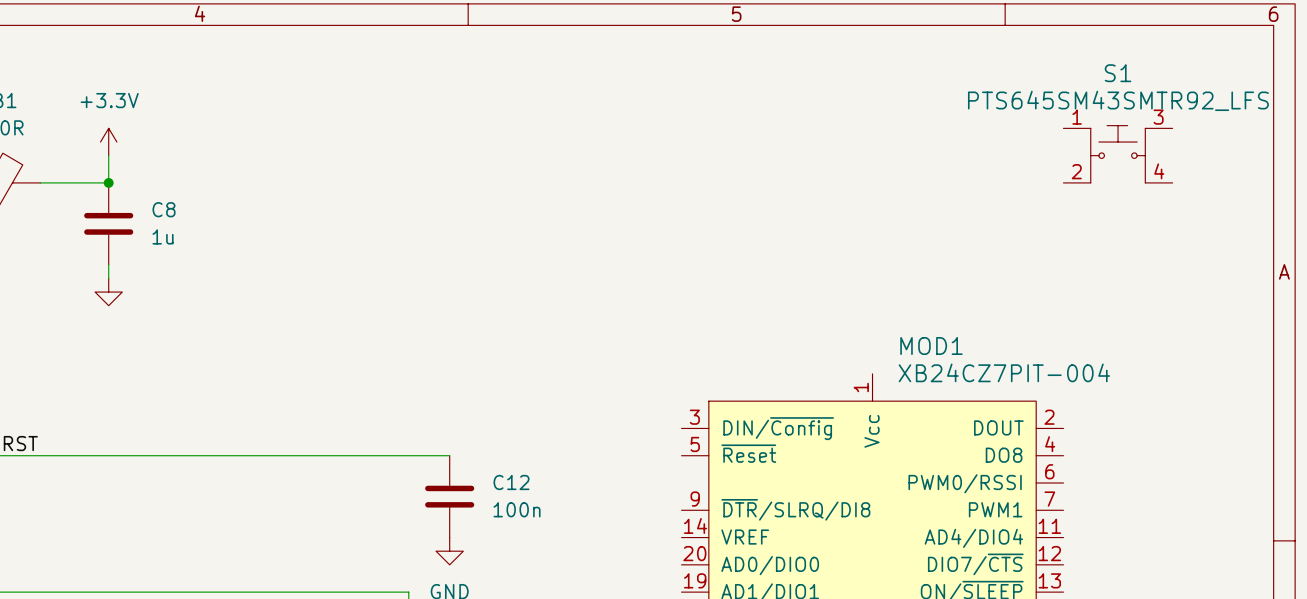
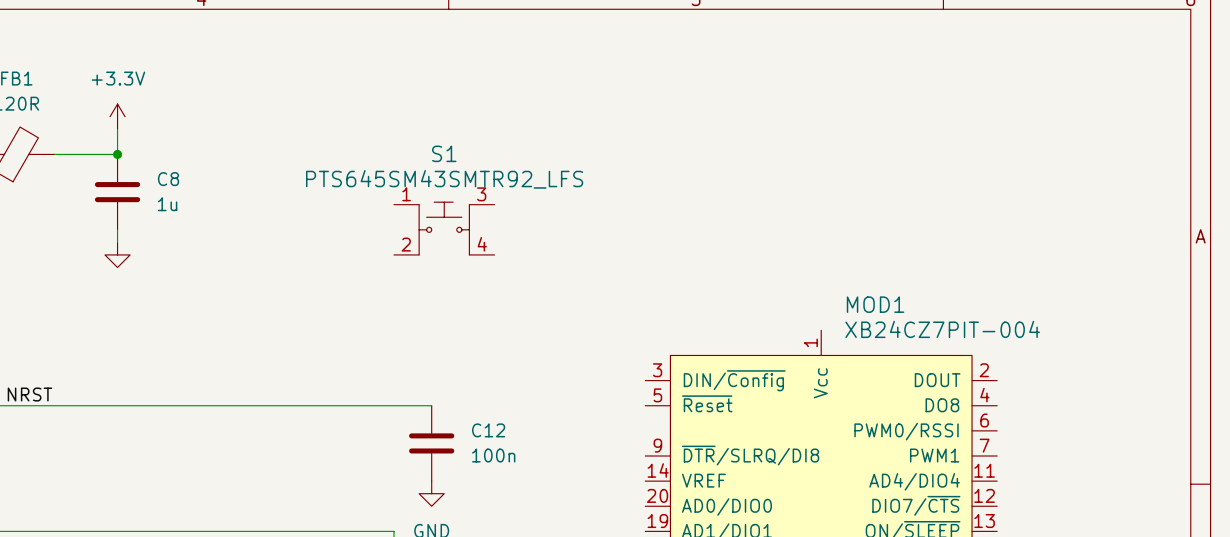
S1 position: (1118, 154) -> (444, 228)

